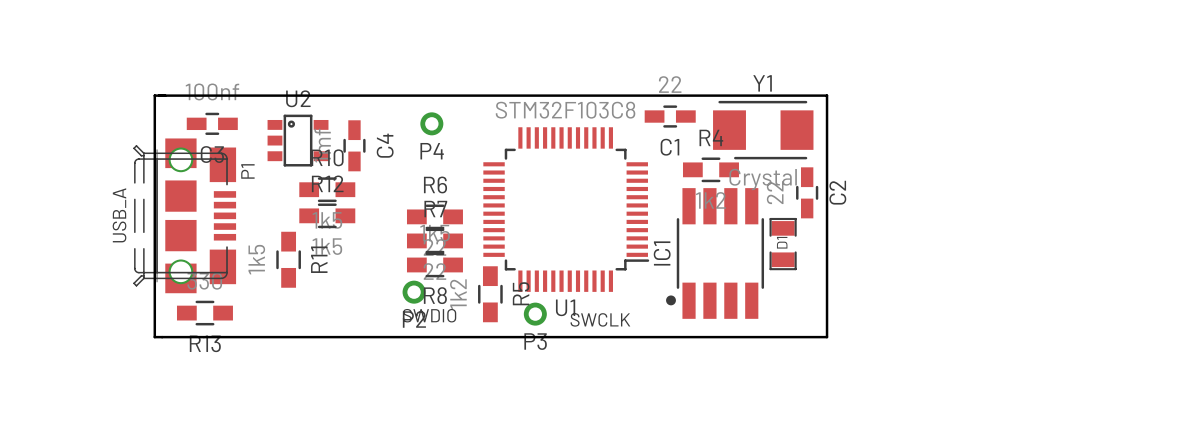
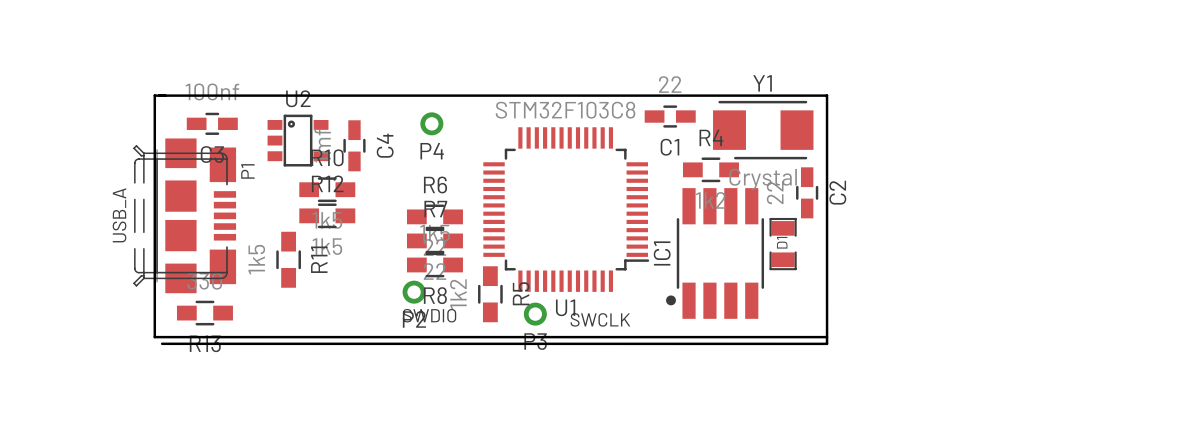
P1 footprint: [133, 138, 237, 294] -> [133, 138, 237, 294]
board edge: none -> (827, 337) (827, 343) (162, 343)

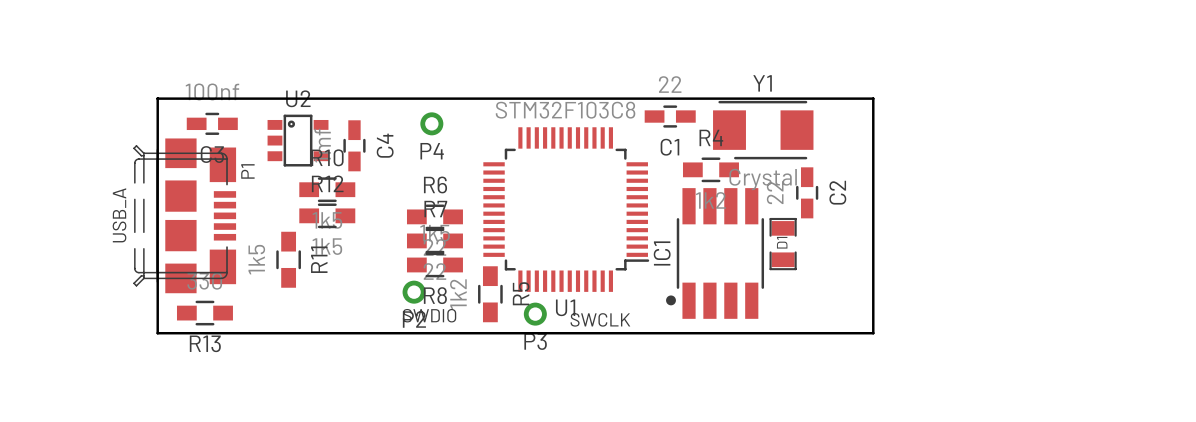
board edge: none -> (157, 98) (157, 333) (873, 333) (873, 98) (157, 98)
board edge: (827, 337) (154, 337) (154, 95) (827, 95) (827, 343) (162, 343) -> none

